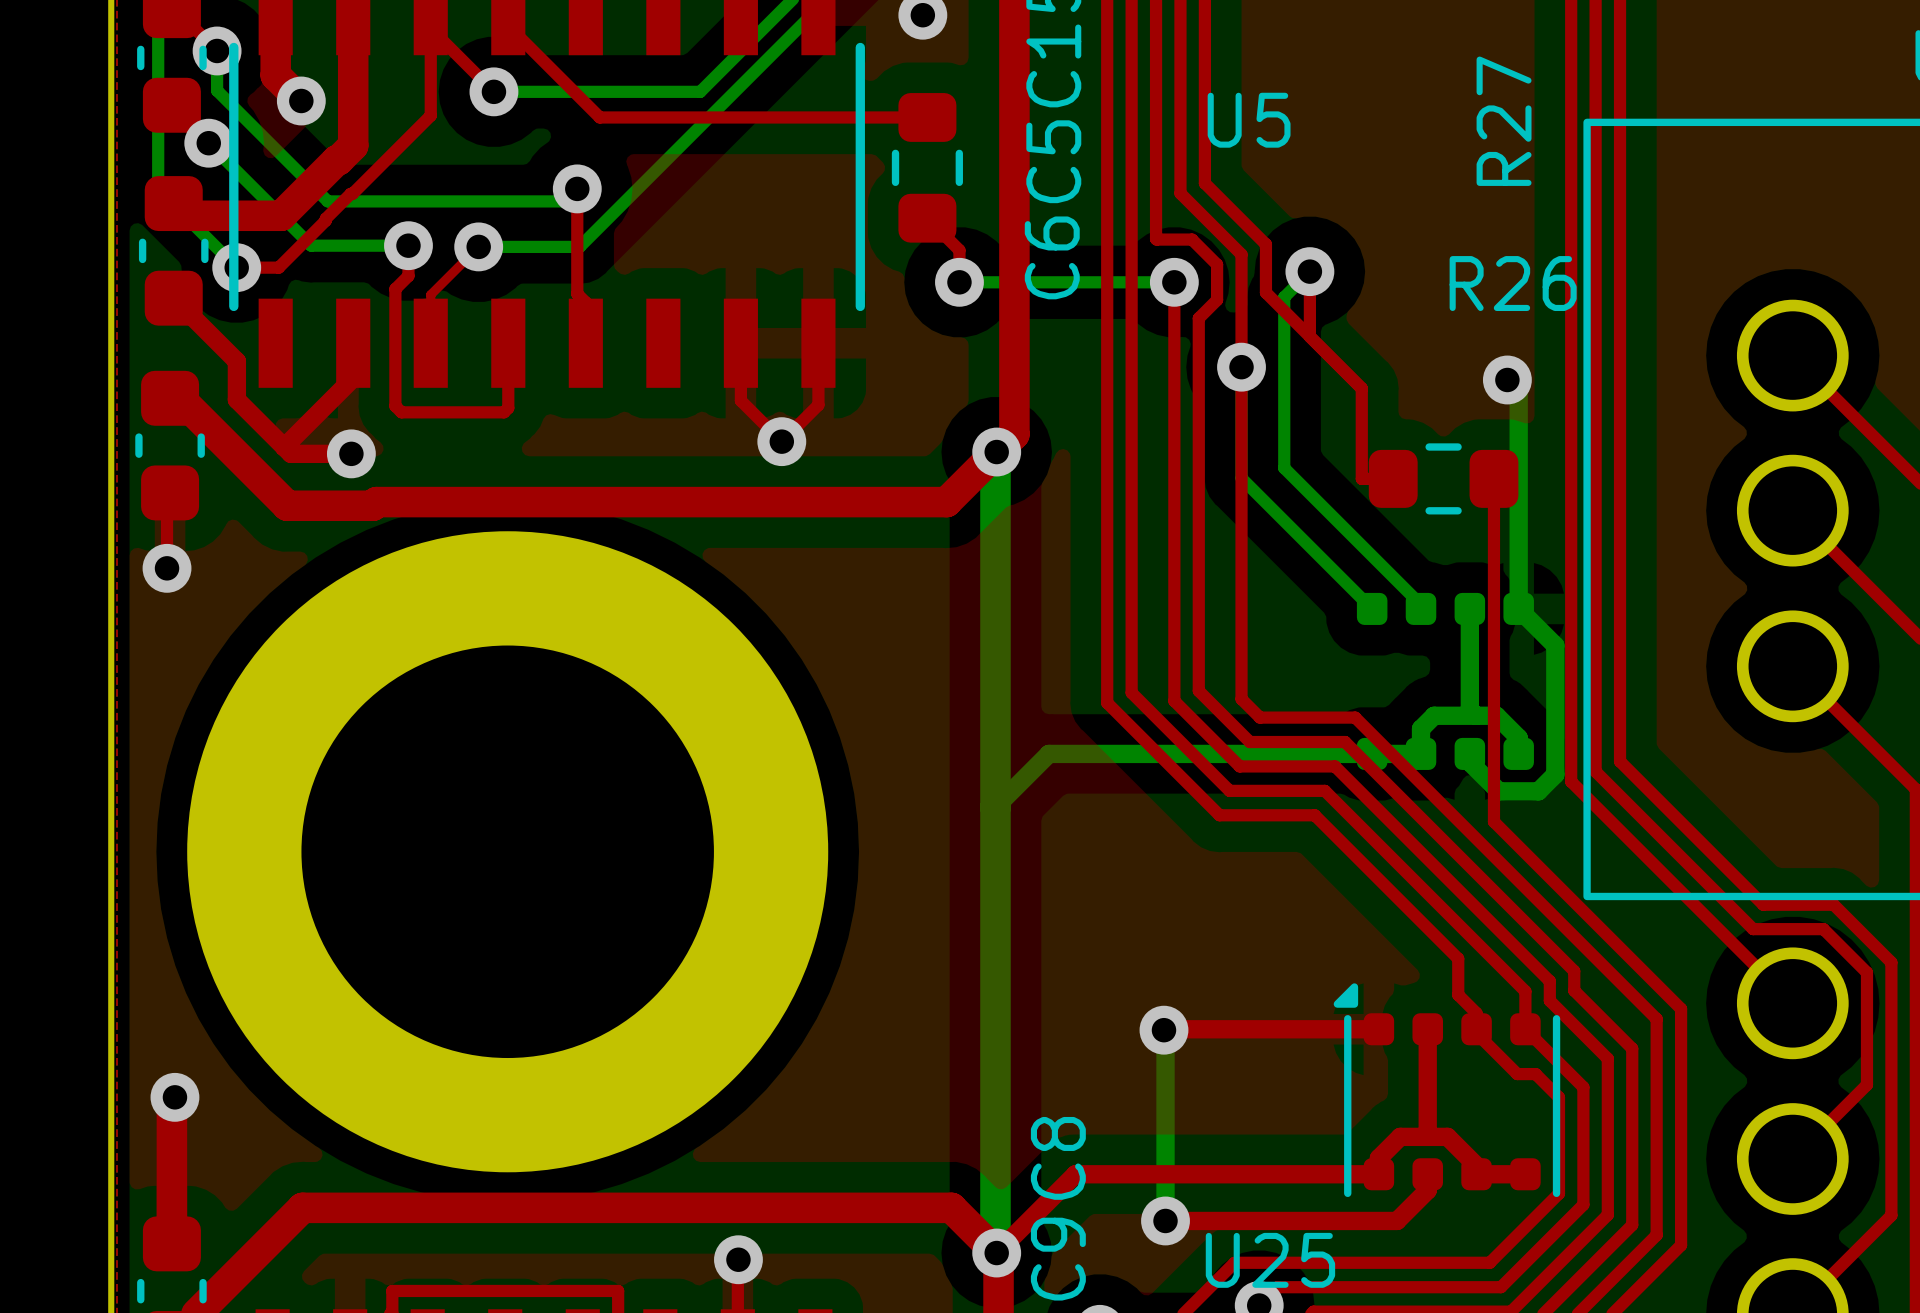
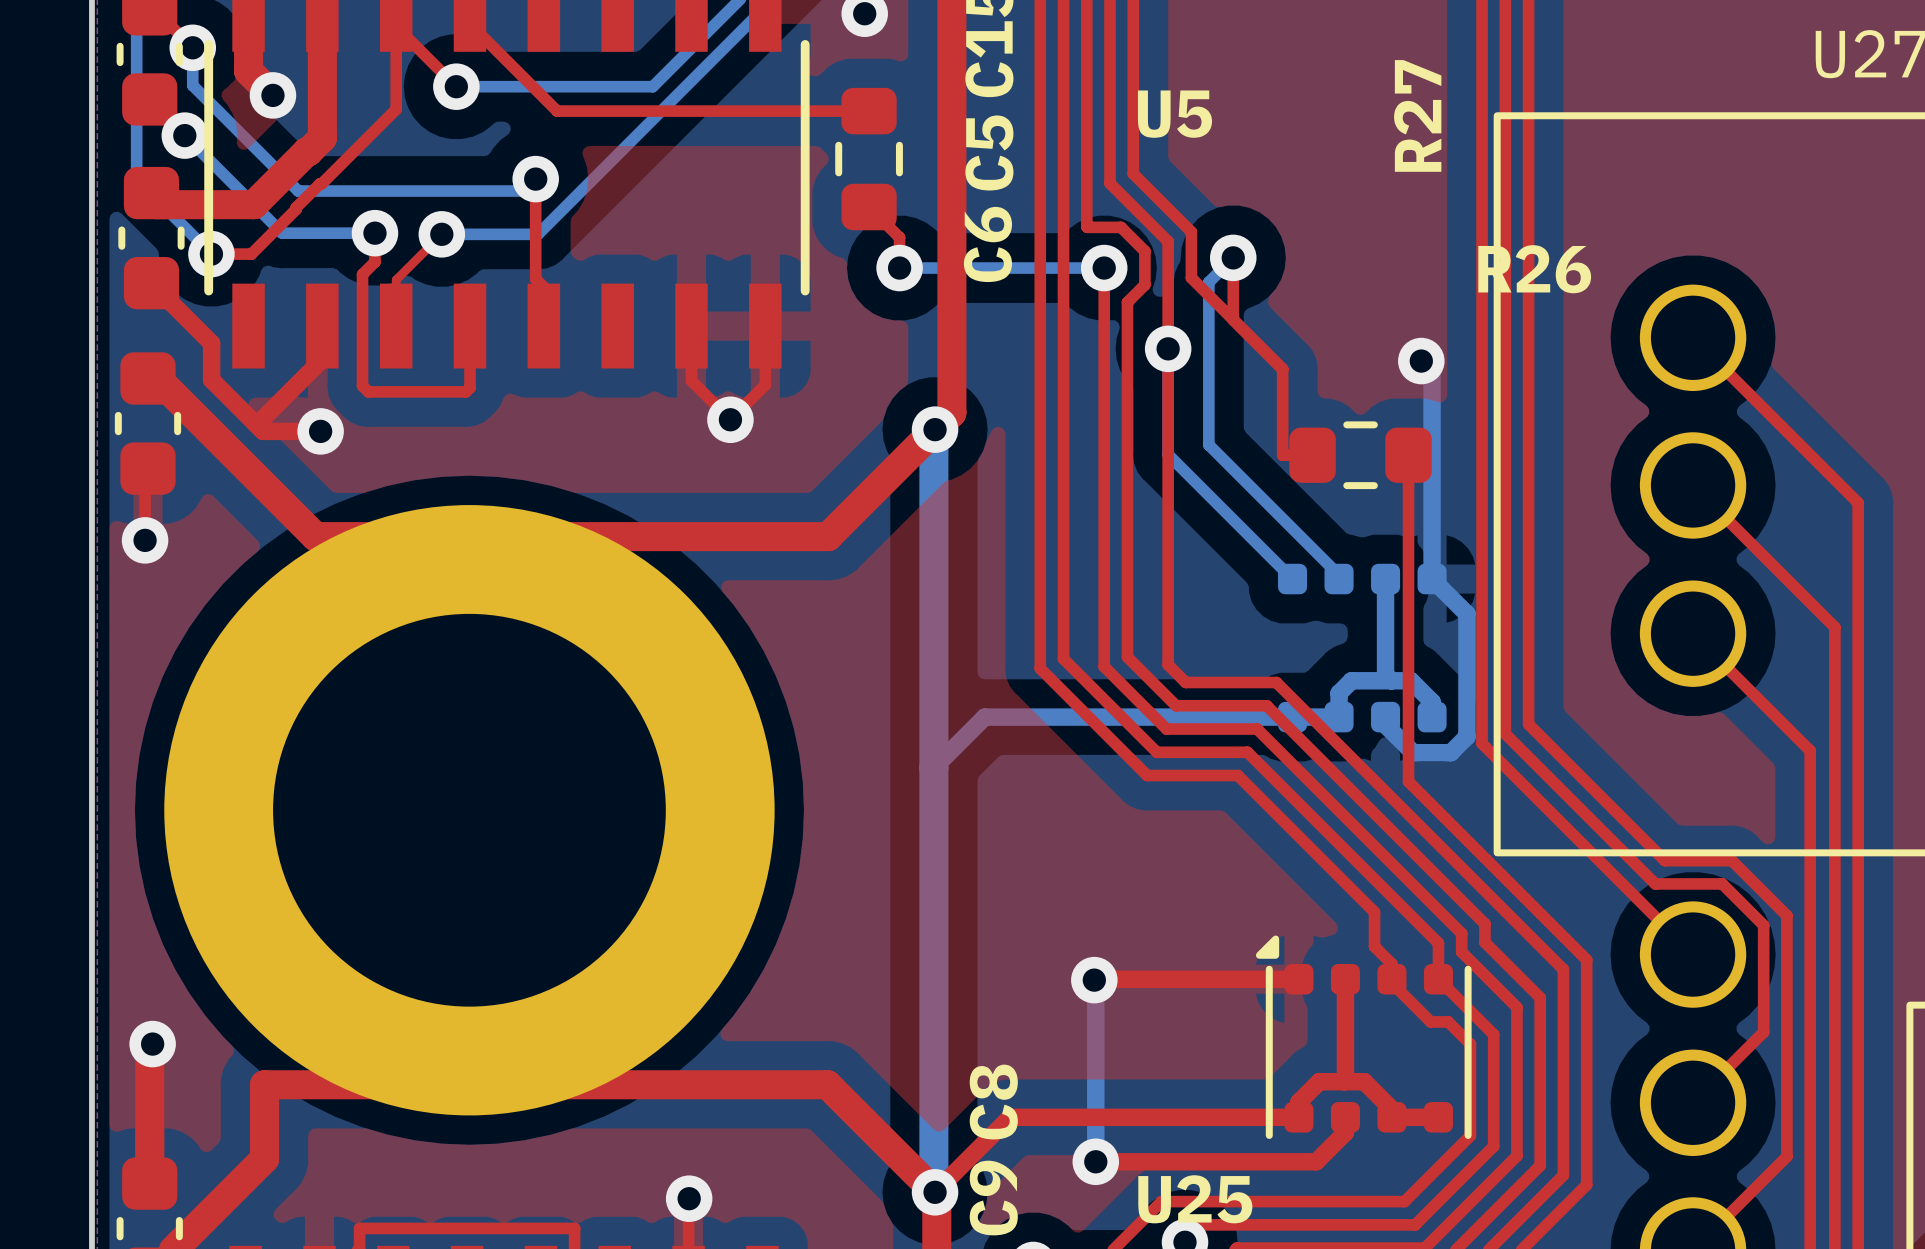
R26 name position: R26 (1513, 283) -> R26 (1534, 269)
top track: (946, 502) (376, 502) (372, 505) (287, 505) -> (887, 477) (828, 536) (315, 536) (259, 480)
top track: (951, 1207) (302, 1207) (292, 1217) -> (892, 1149) (827, 1084) (264, 1084) (264, 1158)

